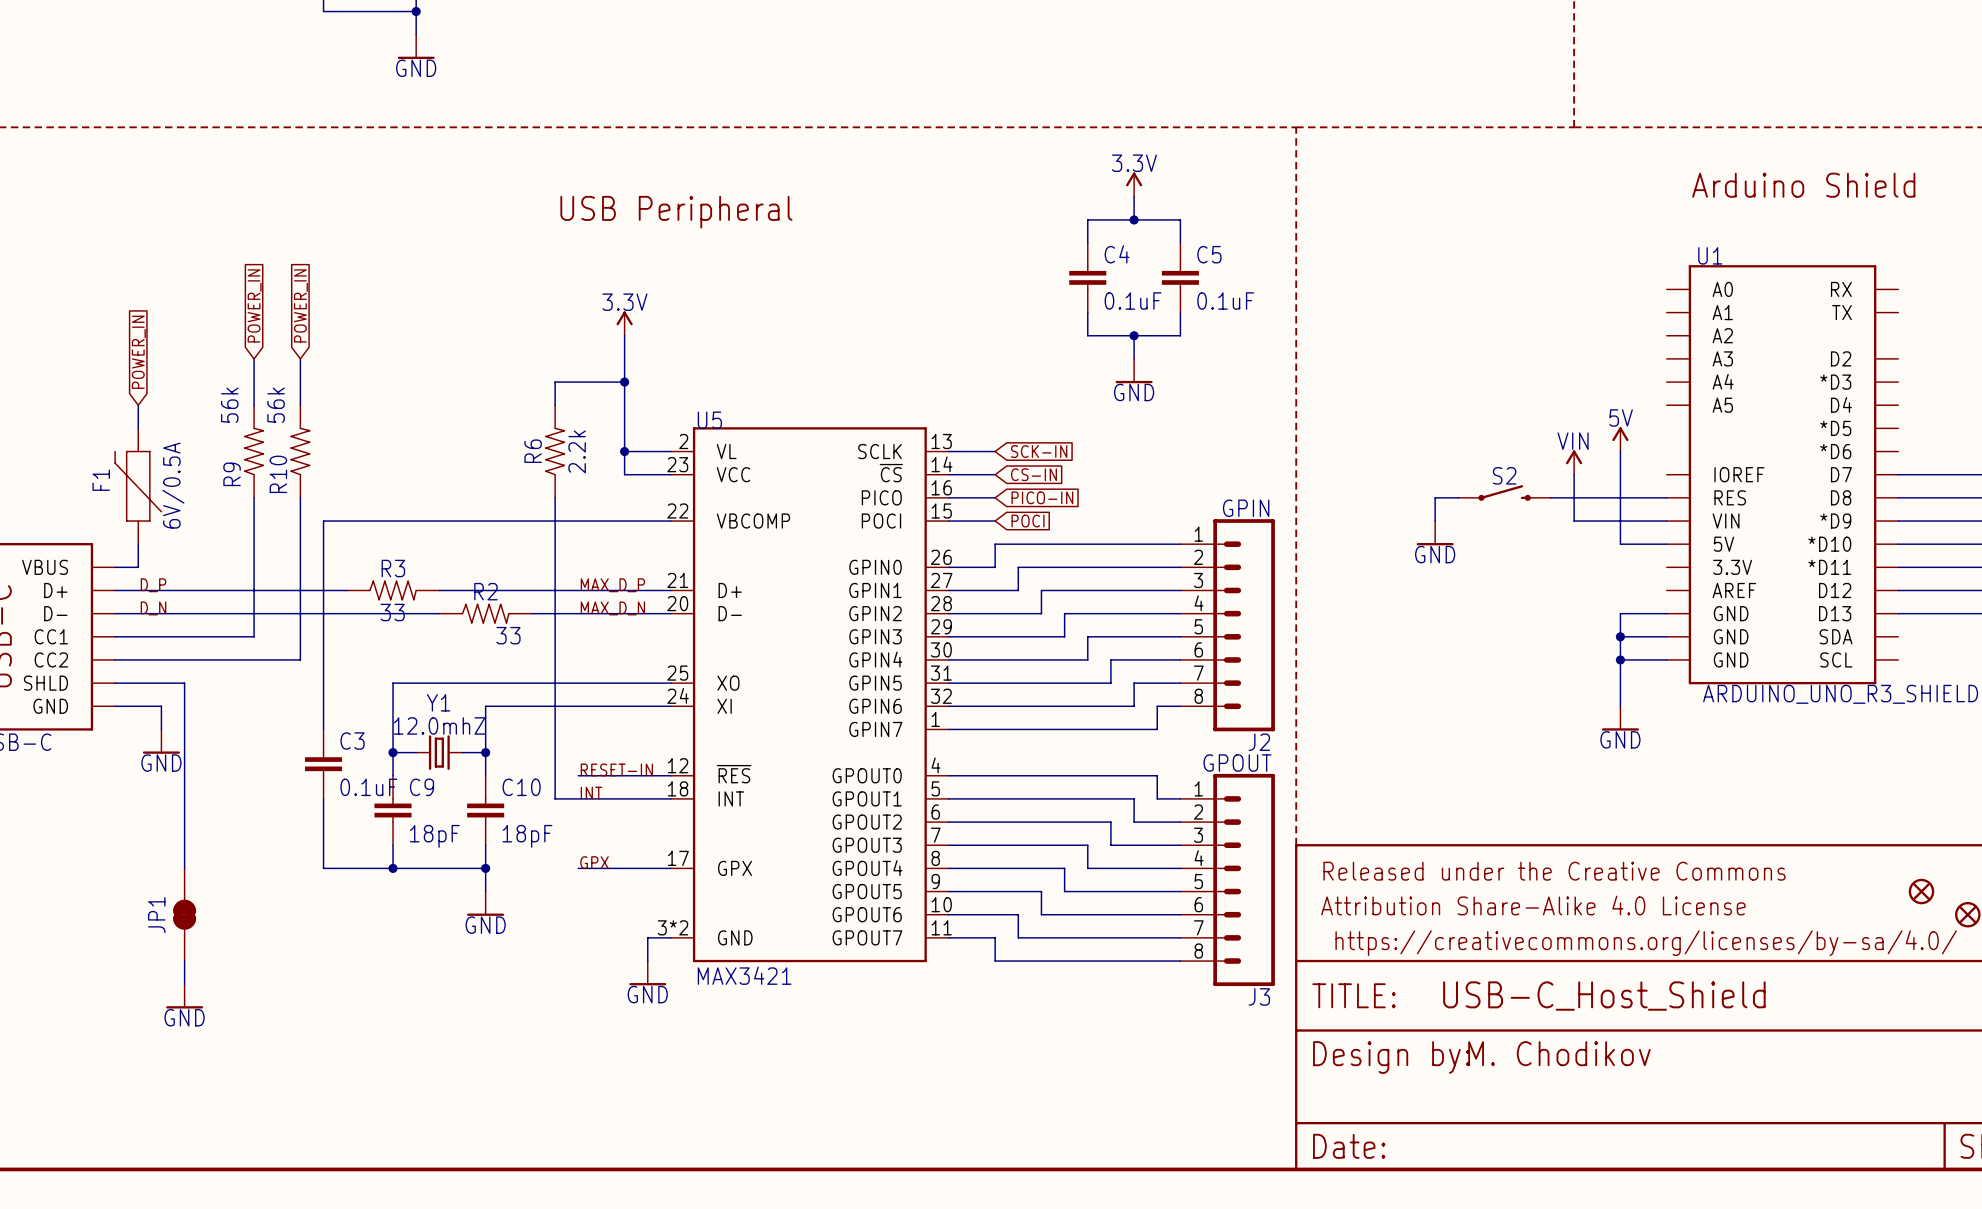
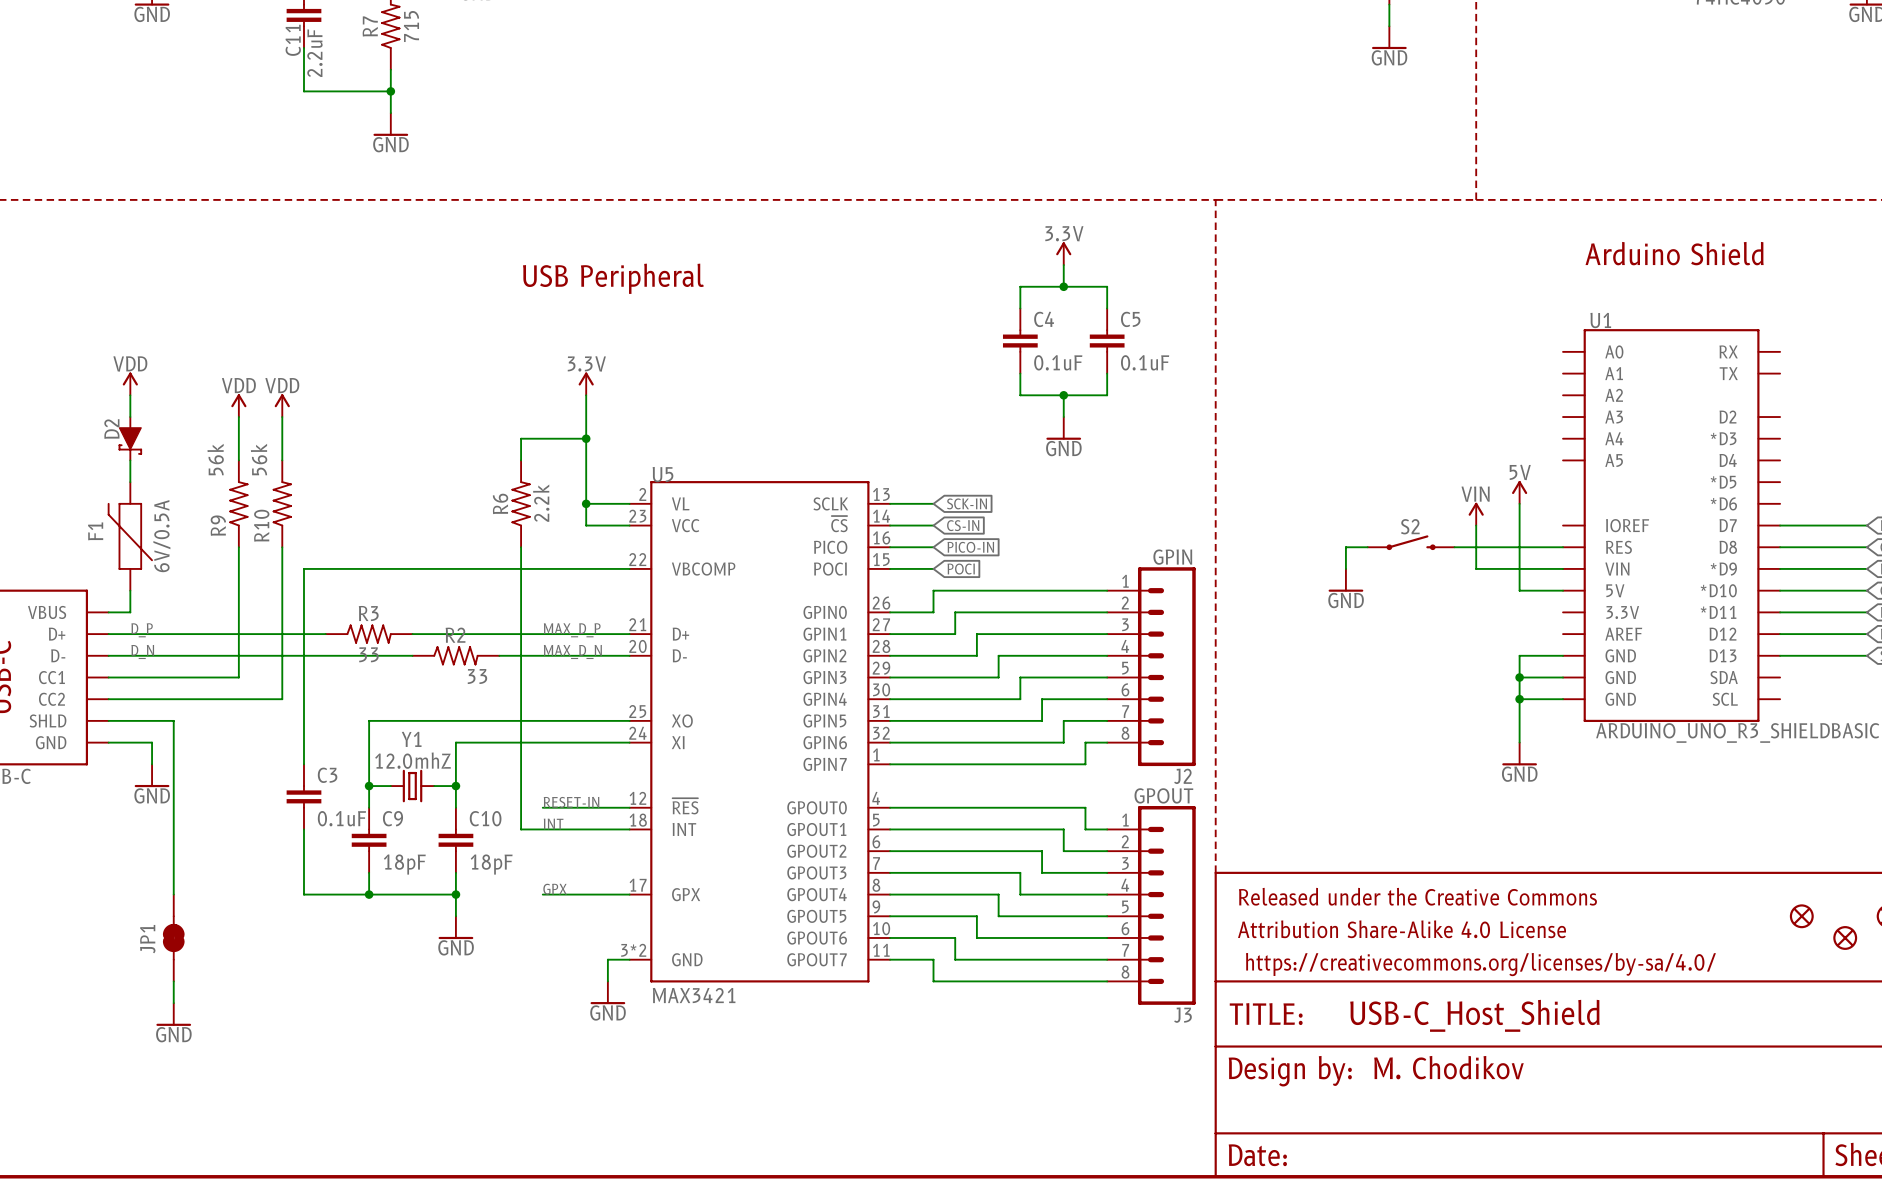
global label: POWER_IN (254, 305) -> none
global label: POWER_IN (300, 305) -> none
power symbol: none -> VDD (130, 383)
wire: none -> (130, 395) (130, 417)
power symbol: none -> VDD (238, 405)
power symbol: none -> VDD (282, 405)
global label: POWER_IN (138, 352) -> none
D2: none -> (130, 438)

